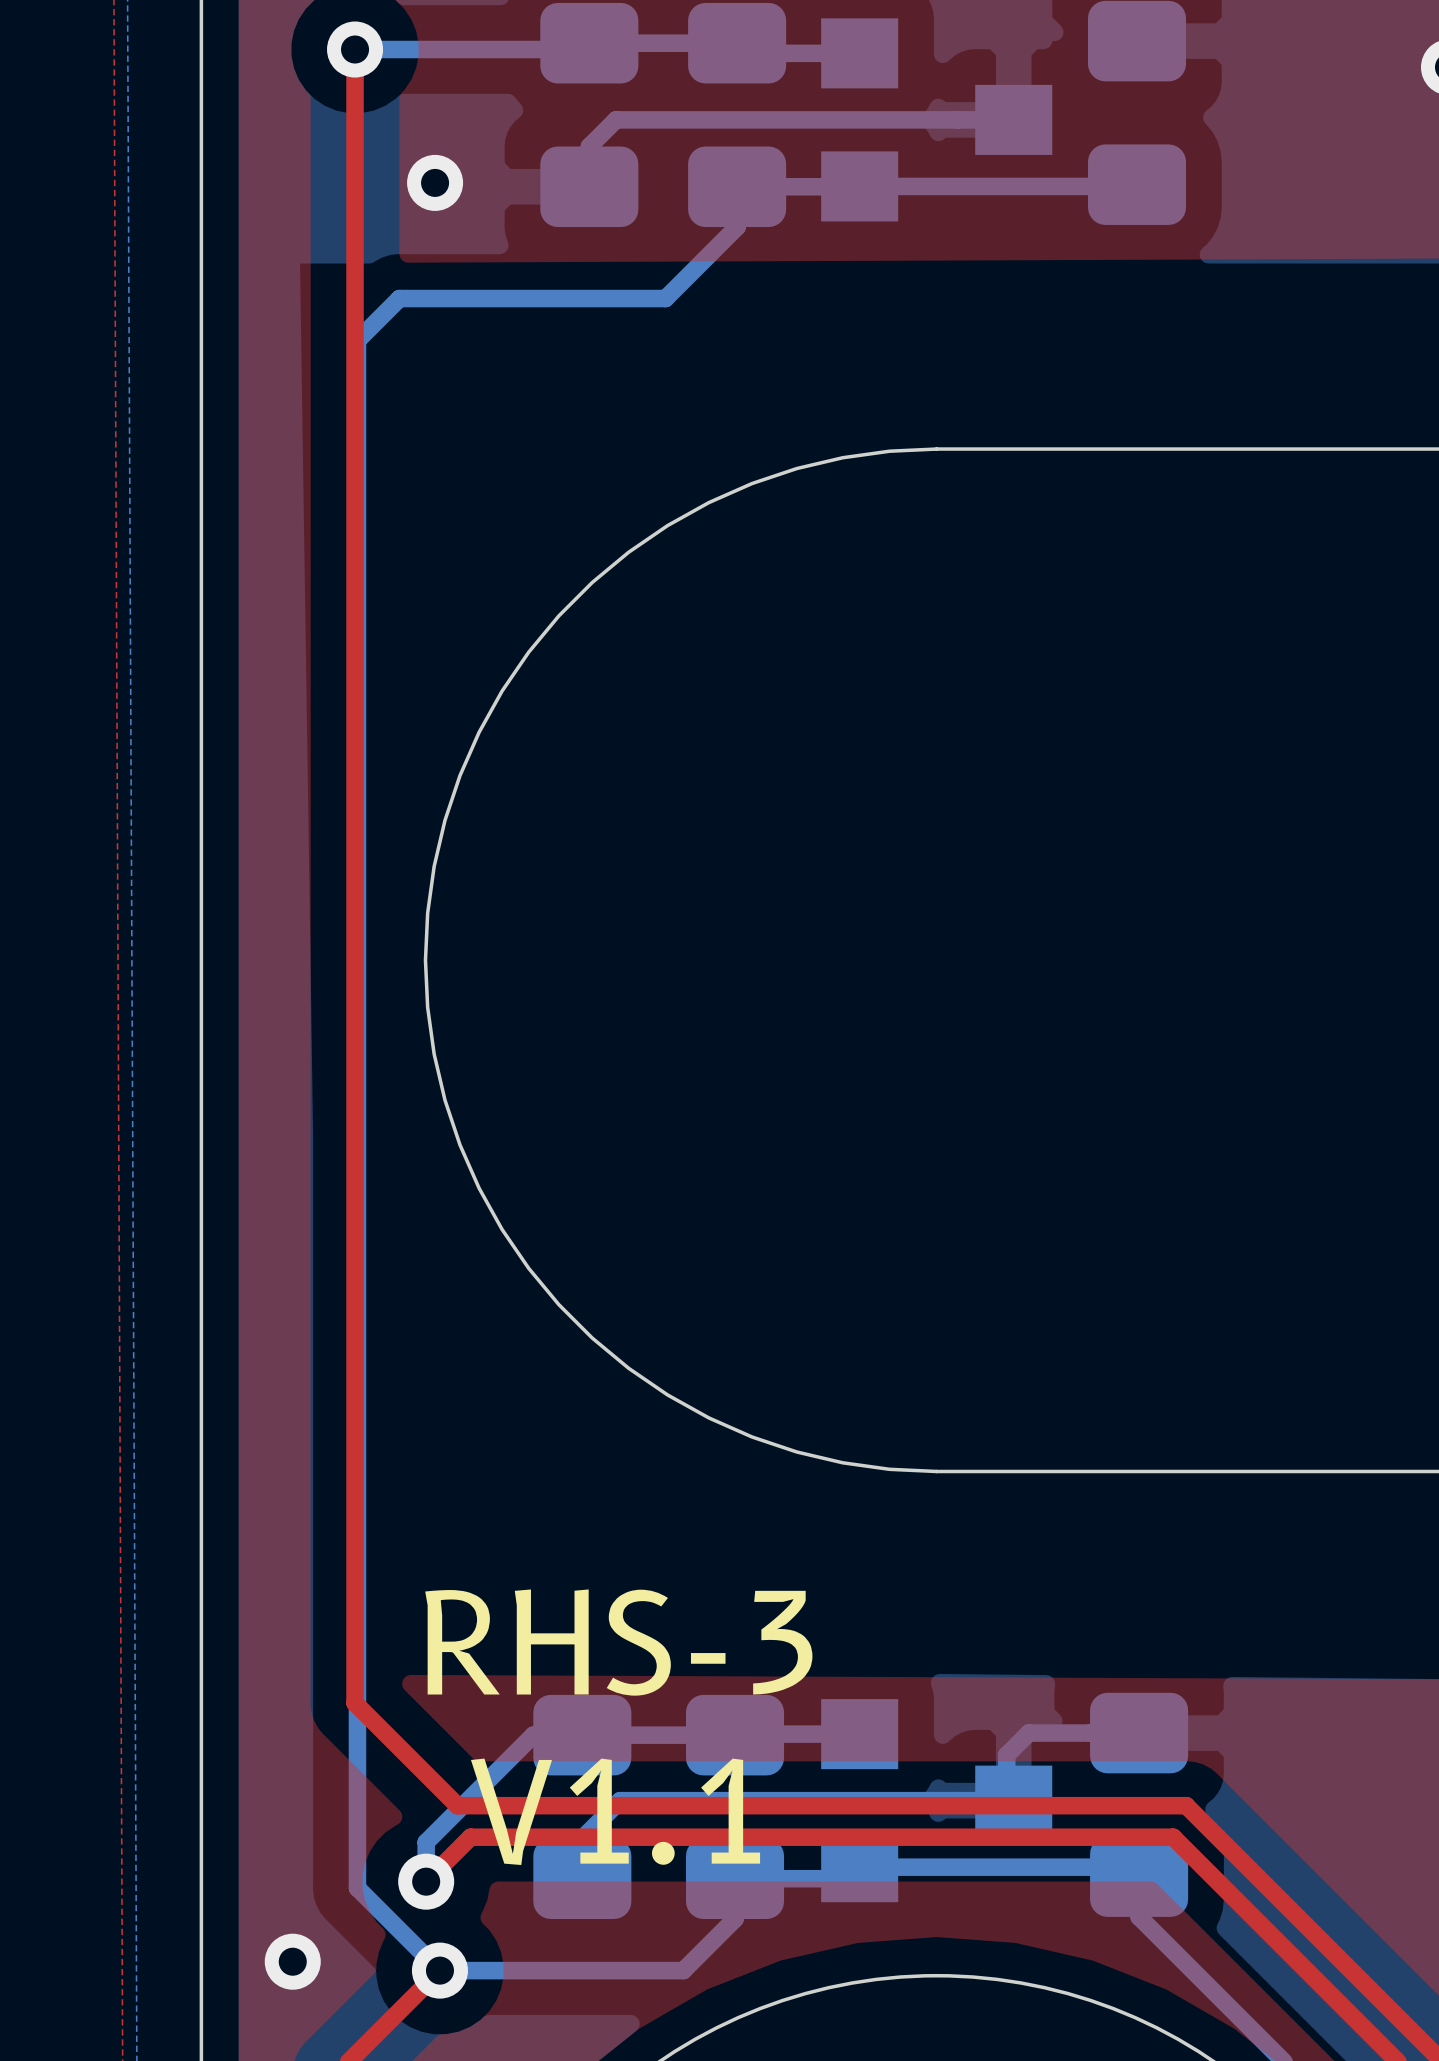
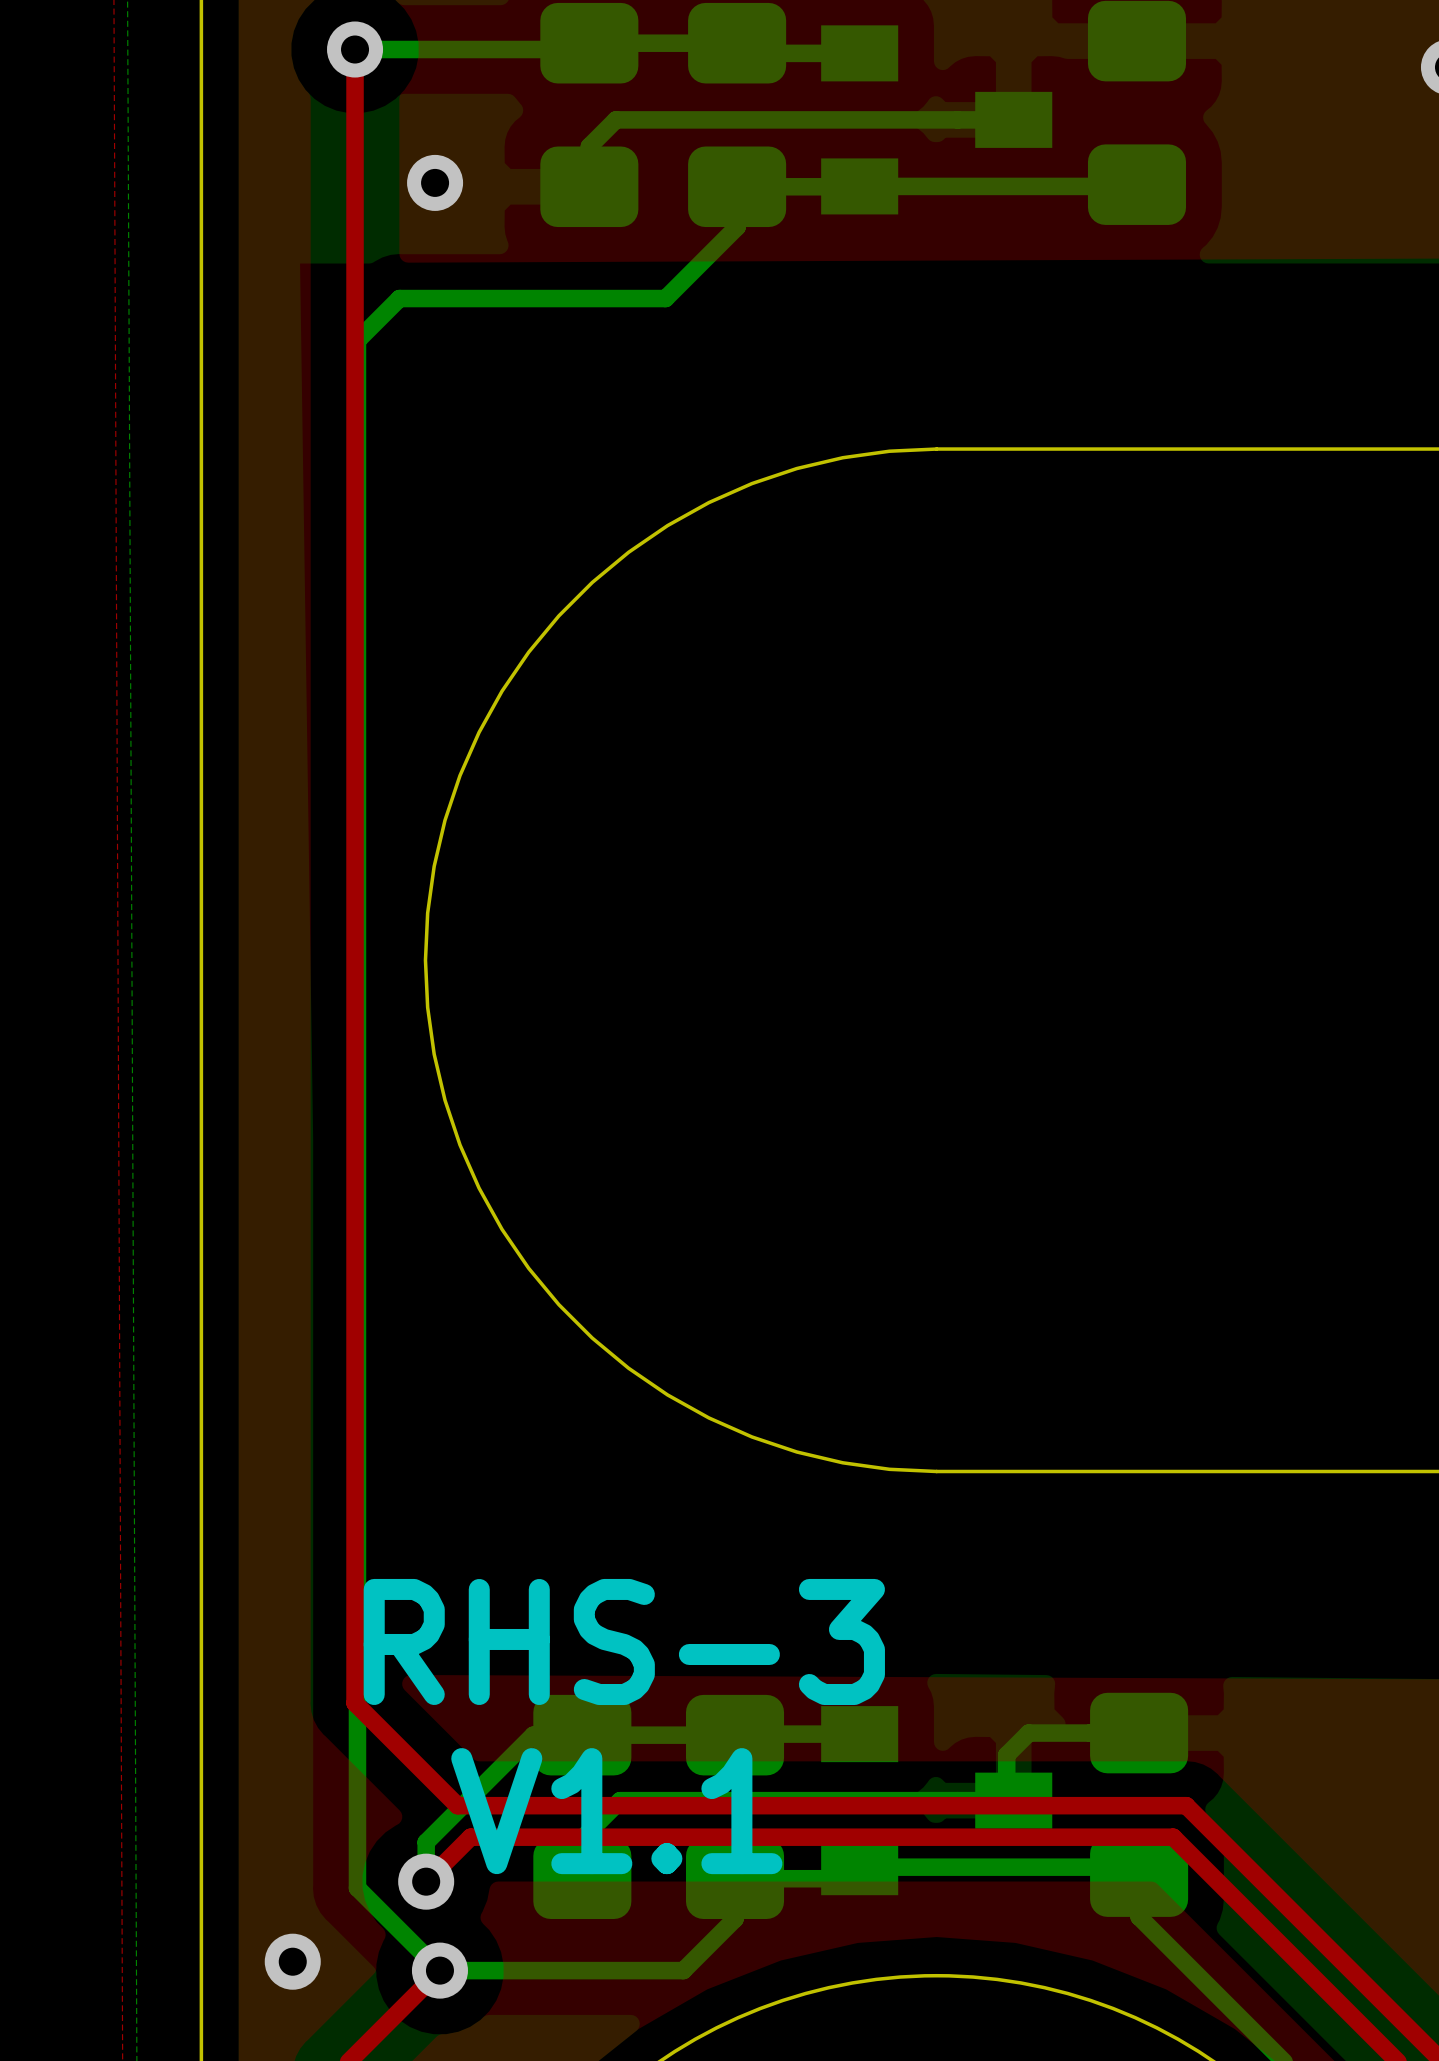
part footprint: [821, 18, 1053, 222] -> [821, 25, 1053, 215]
part footprint: [821, 1699, 1053, 1903] -> [821, 1706, 1053, 1896]

